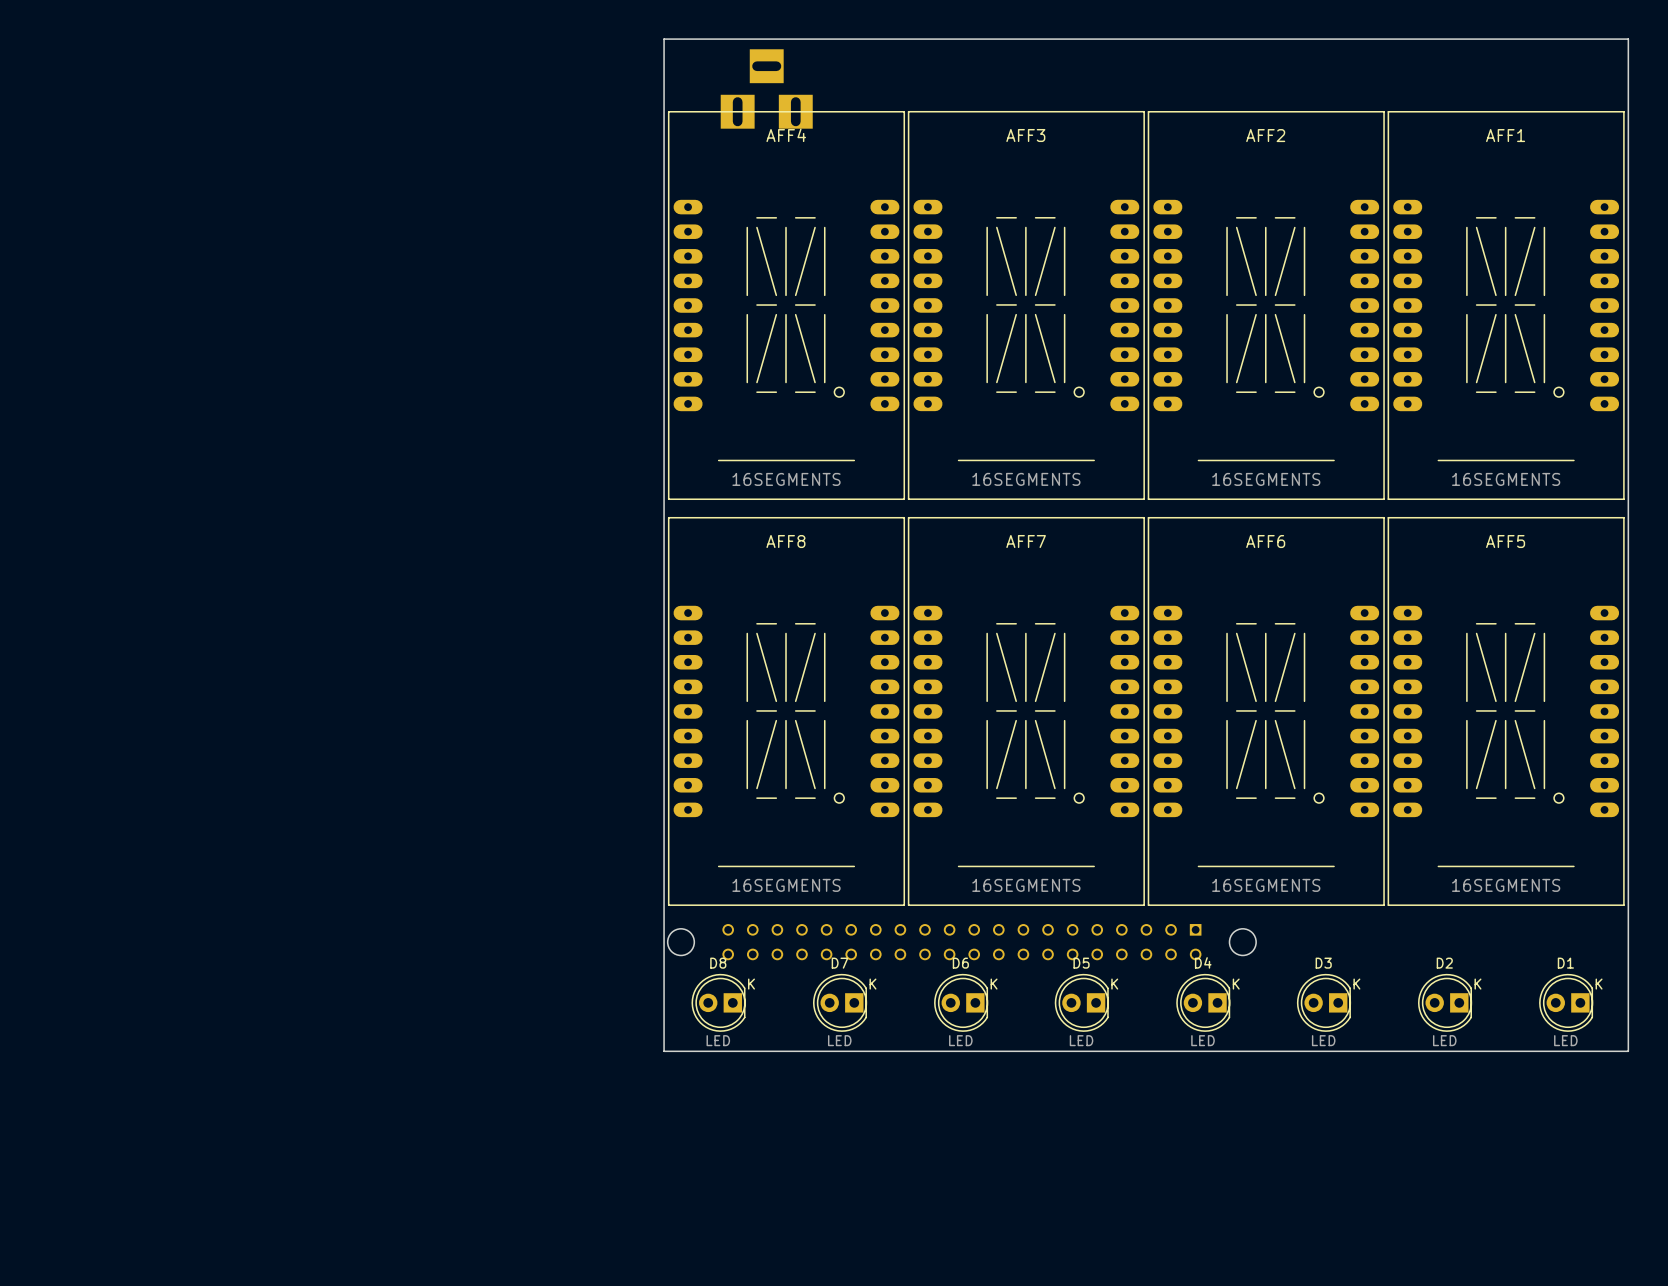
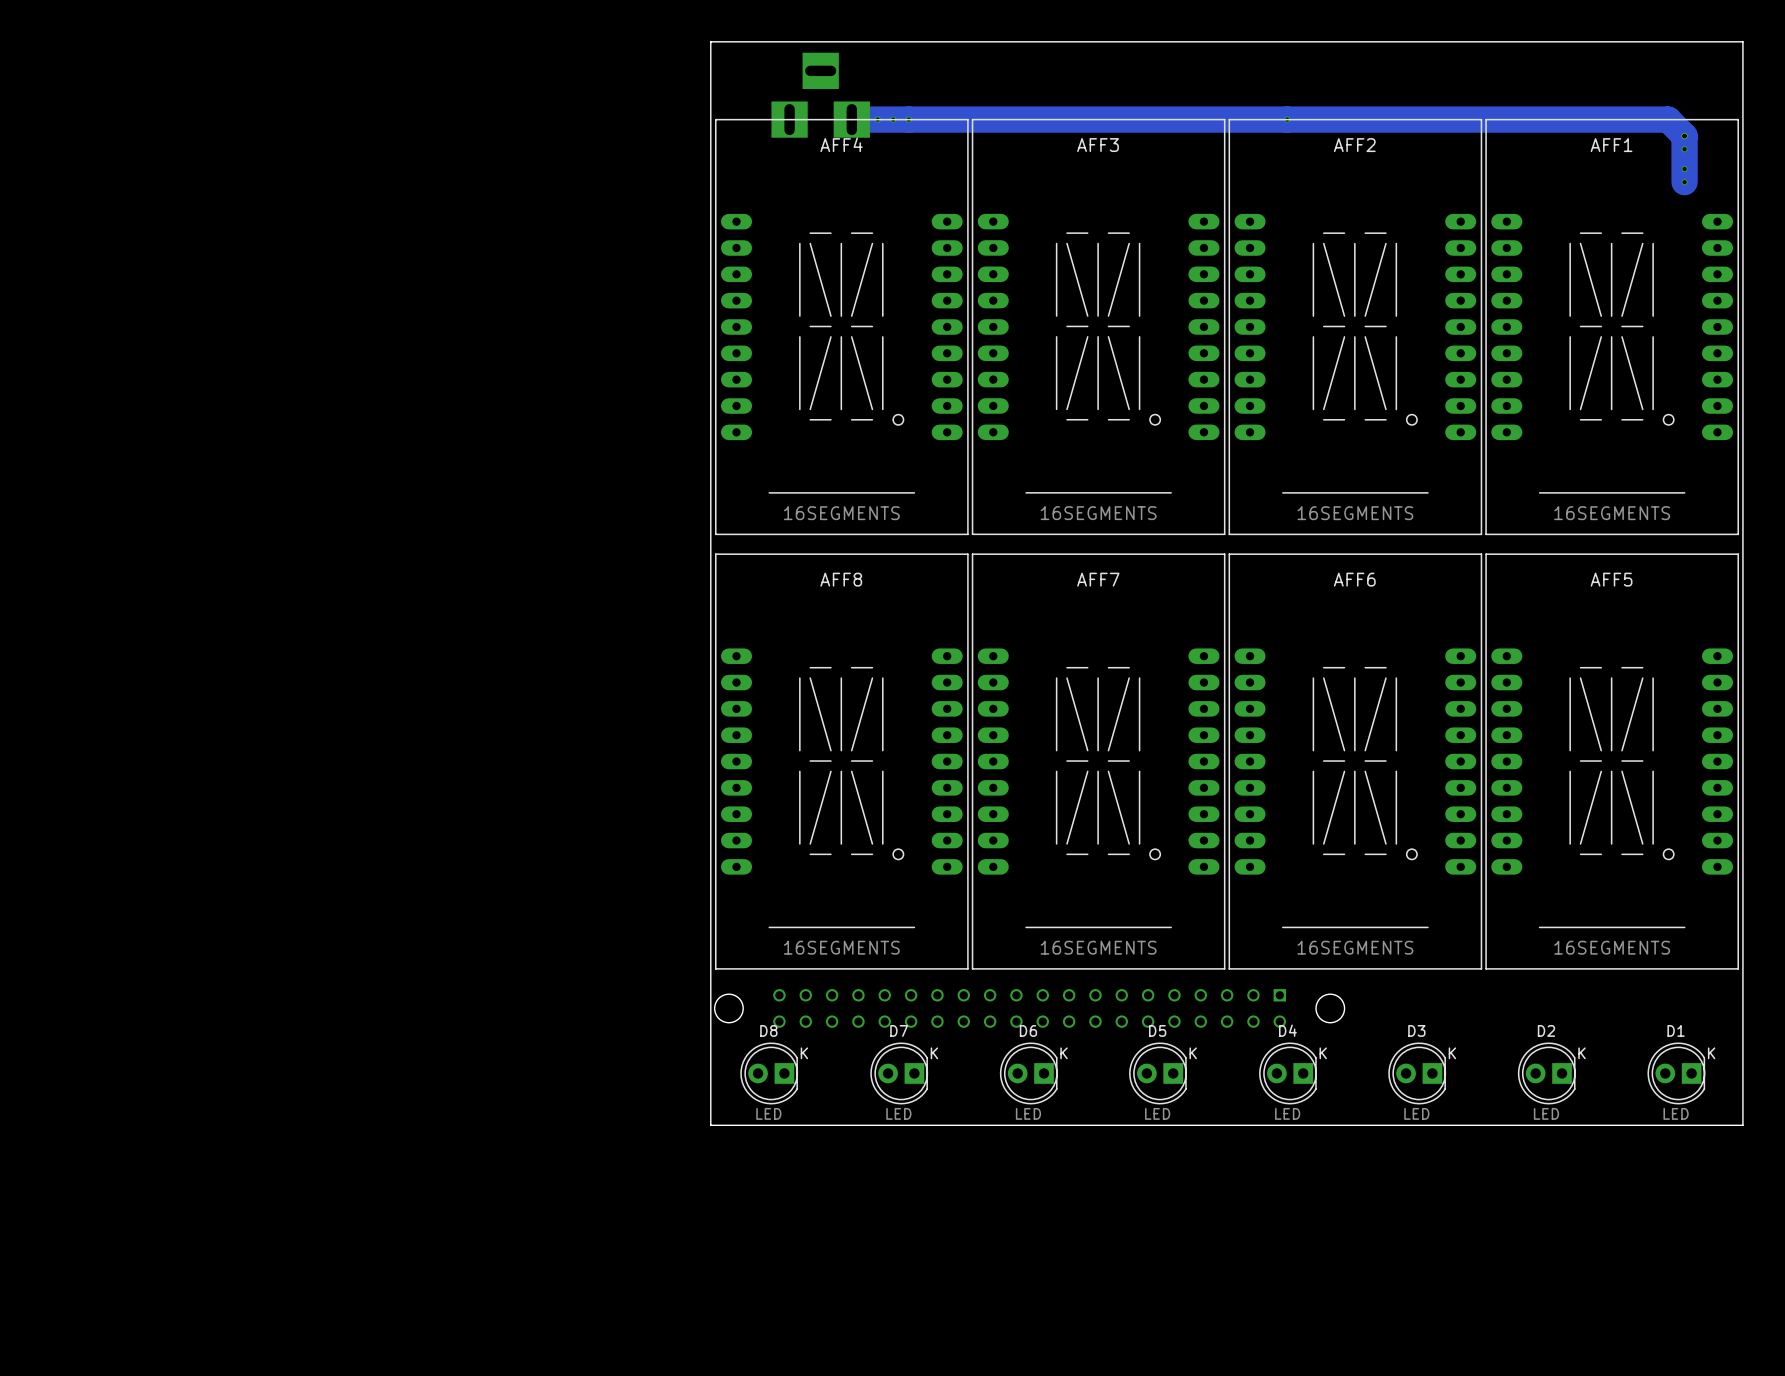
track: none -> (851, 119) (1668, 119) (1684, 136) (1684, 182)
via: none -> (877, 119)
via: none -> (893, 119)
via: none -> (908, 119)
via: none -> (1287, 119)
via: none -> (1684, 136)
via: none -> (1684, 149)
via: none -> (1684, 169)
via: none -> (1684, 182)

